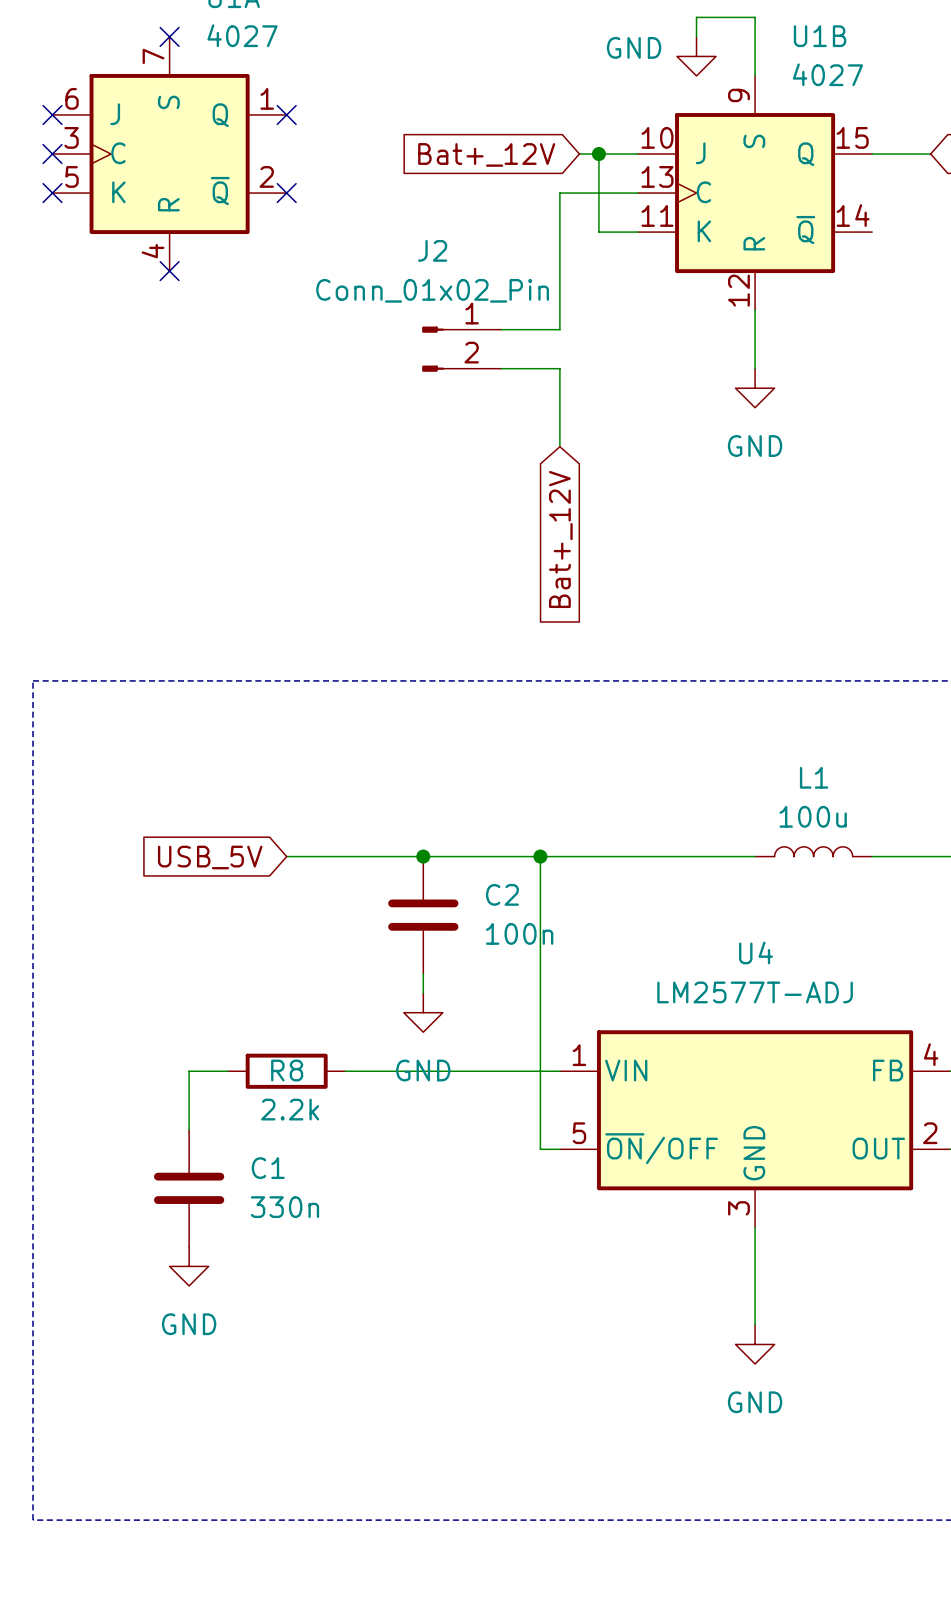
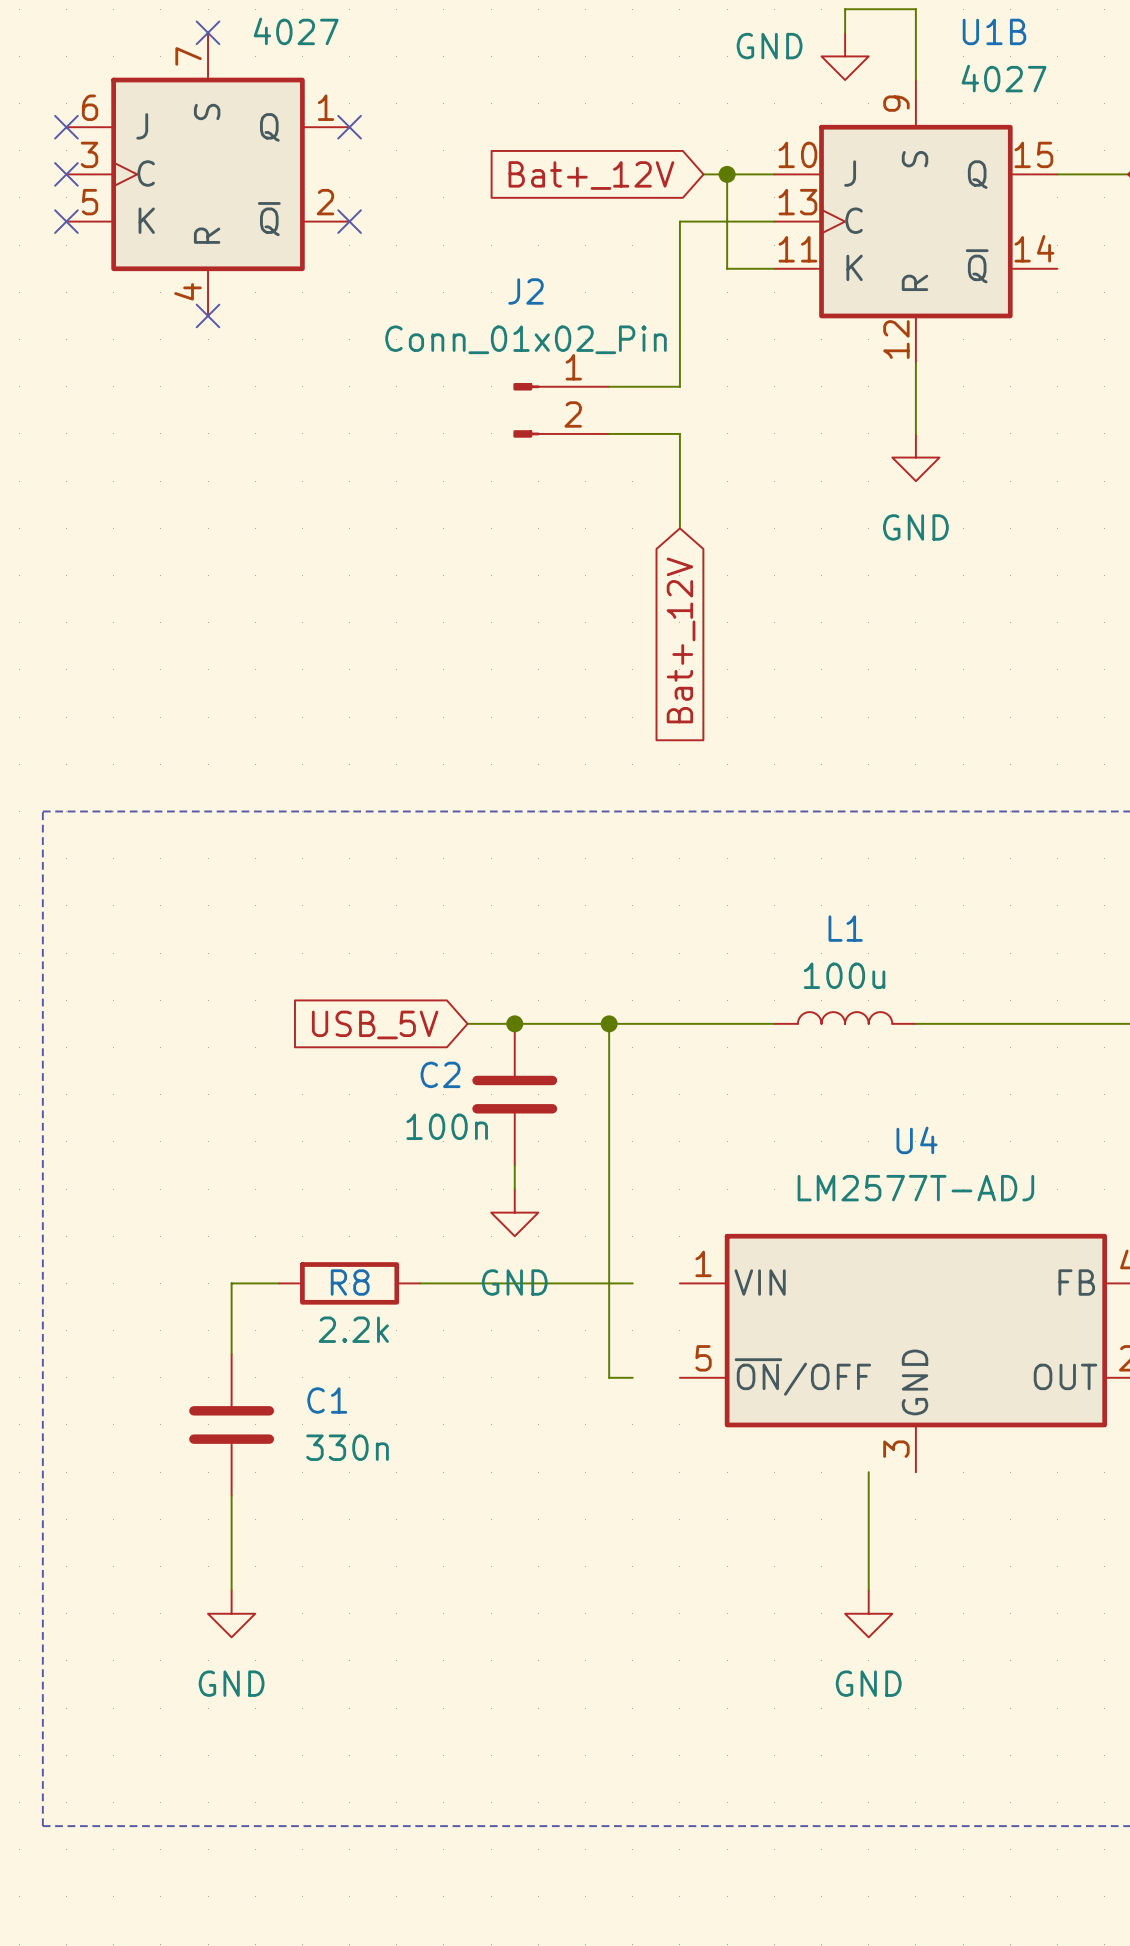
L1 position: (813, 851) -> (845, 1017)
wire: (286, 856) (384, 856) -> none
wire: (540, 856) (540, 1149) (559, 1149) -> (609, 1023) (609, 1377) (632, 1377)
junction position: (540, 856) -> (609, 1023)
wire: (637, 856) (755, 856) -> (1057, 1023) (915, 1023)
global label position: USB_5V (210, 857) -> USB_5V (375, 1024)
C2 name position: C2 (502, 894) -> C2 (440, 1074)
C2 value position: 100n (519, 933) -> 100n (447, 1126)
wire: (520, 1071) (559, 1071) -> none
wire: (755, 1227) (755, 1324) -> (868, 1472) (868, 1590)
wire: none -> (231, 1495) (231, 1590)
power symbol position: GND (189, 1266) -> GND (231, 1613)
power symbol position: GND (755, 1344) -> GND (868, 1613)

